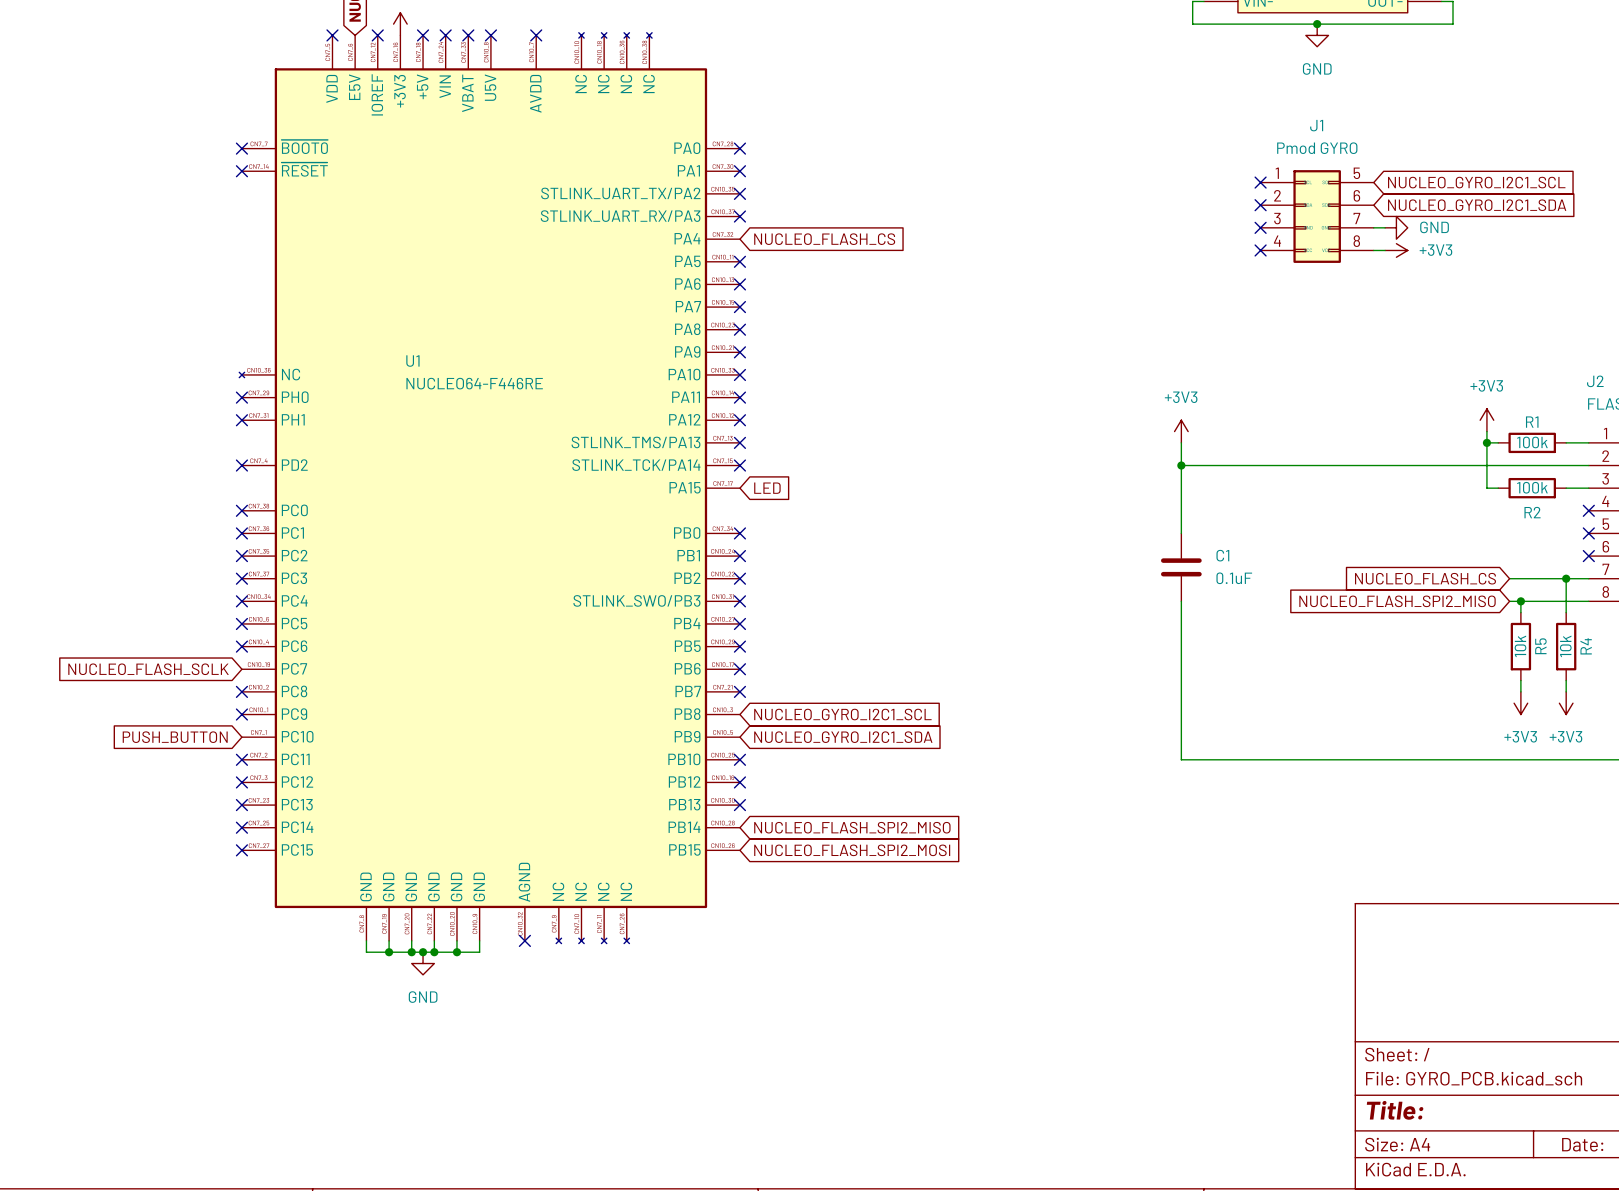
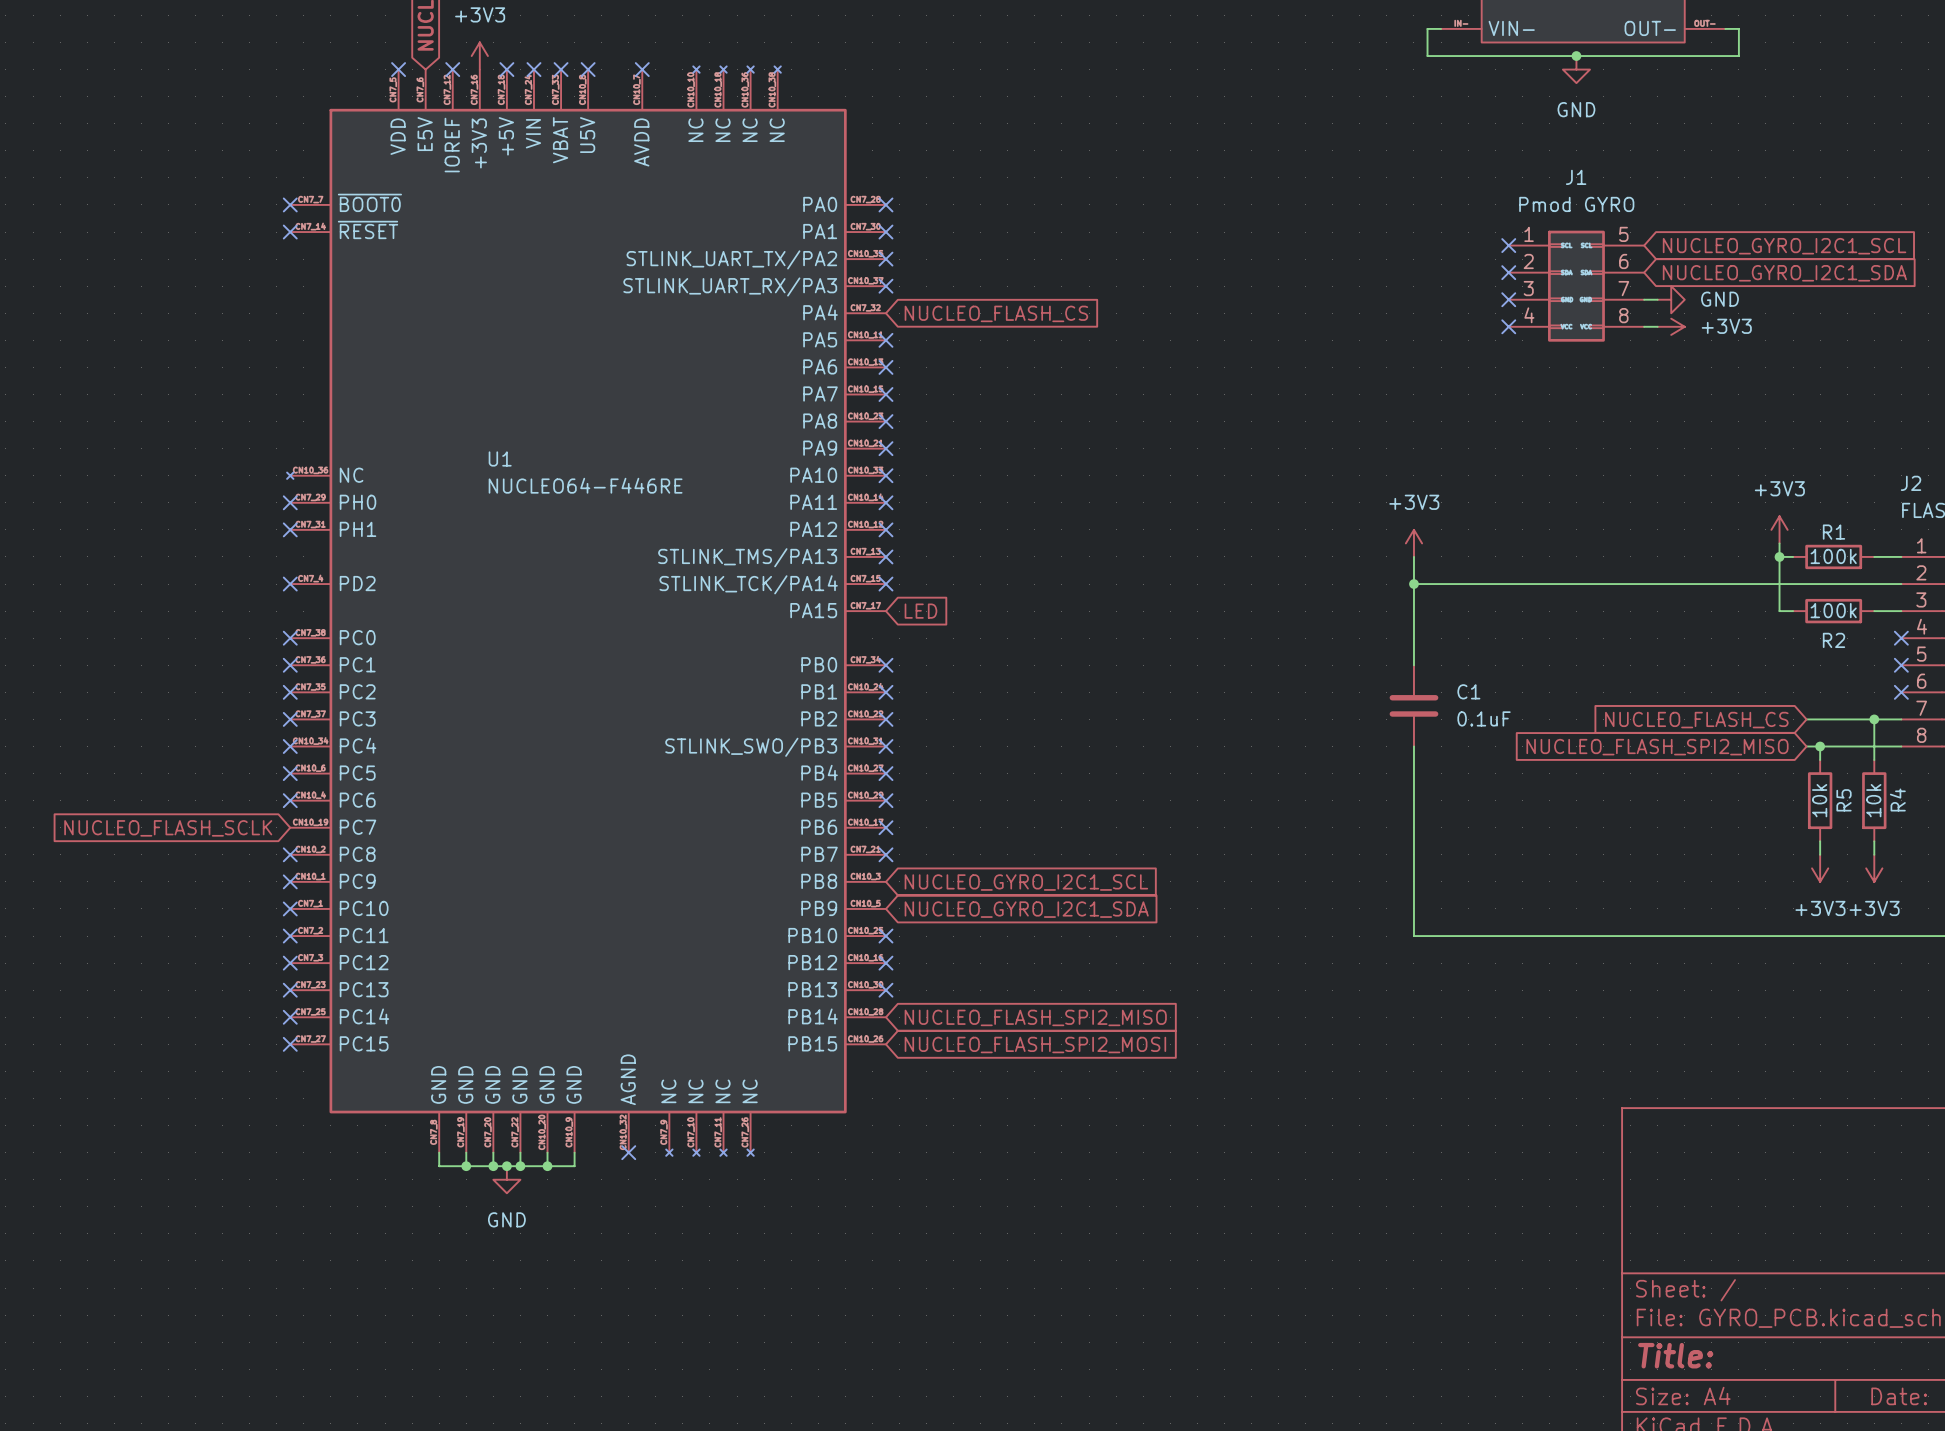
global label: PUSH_BUTTON (175, 737) -> none
no-connect mark: none -> (290, 908)

